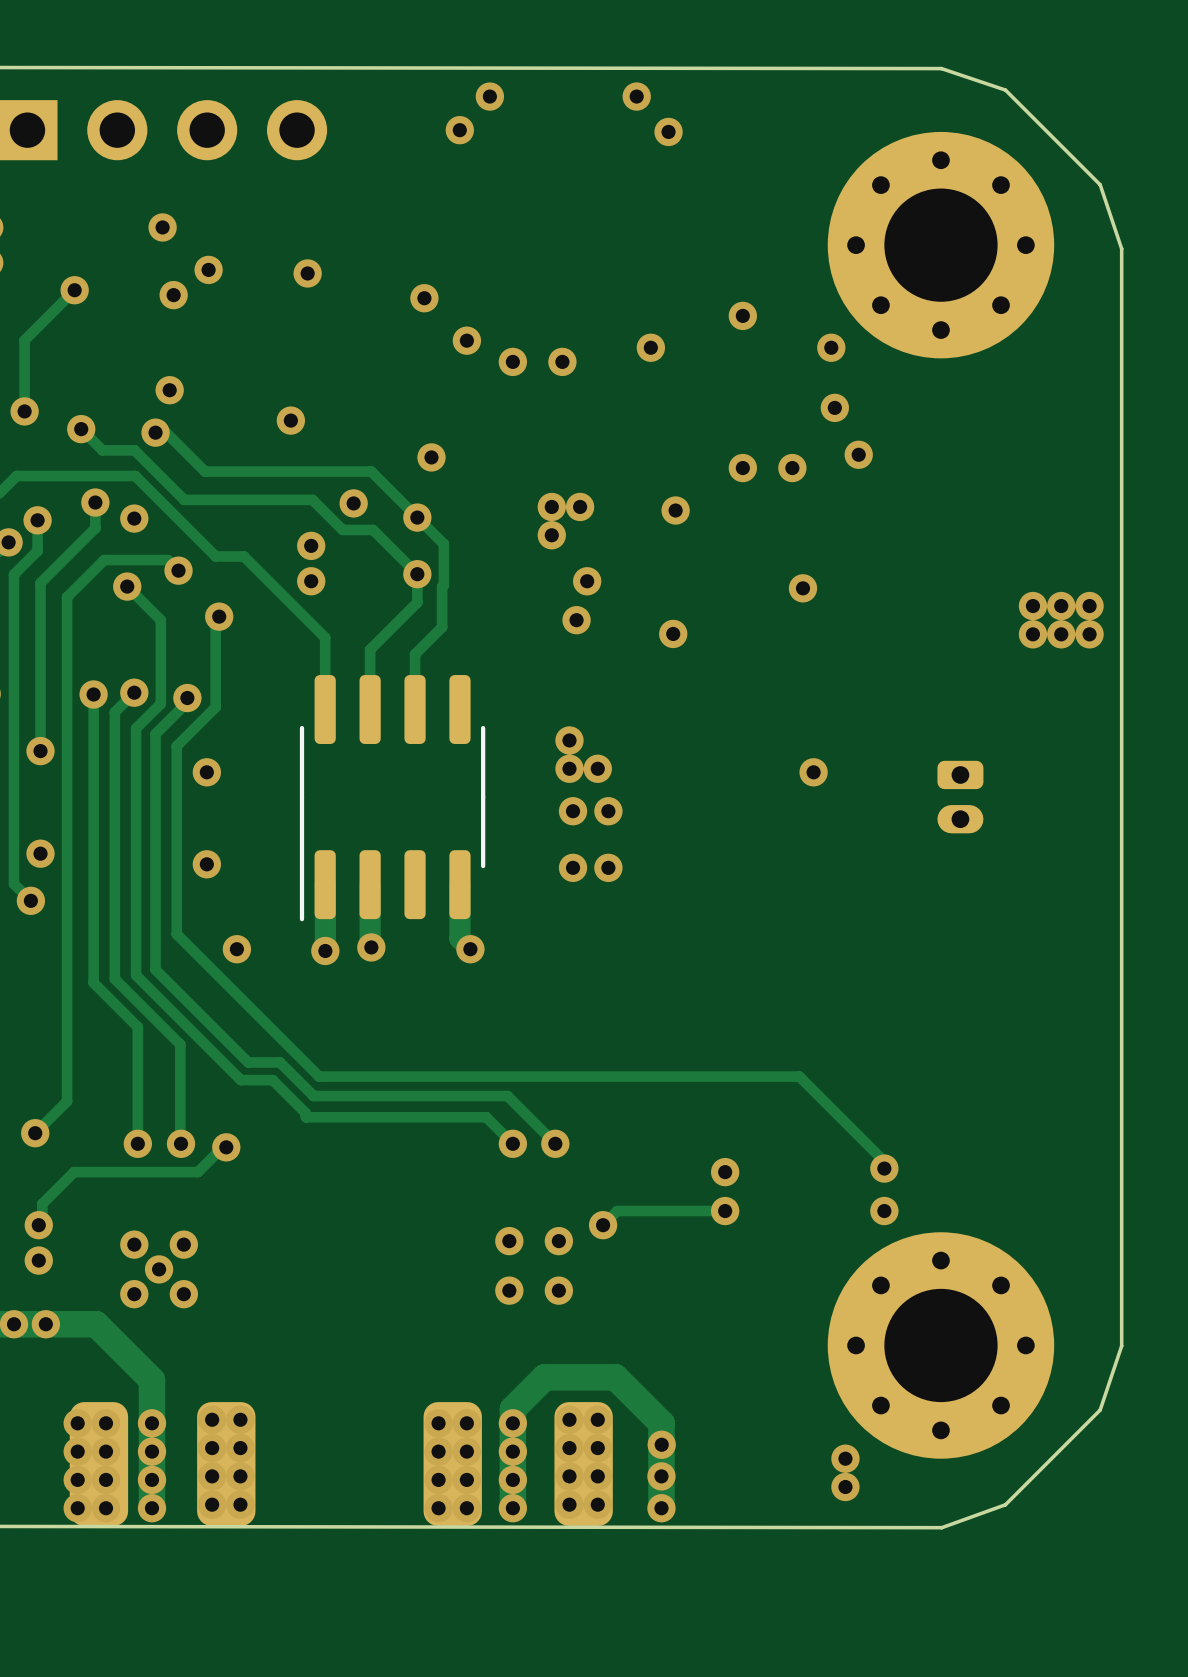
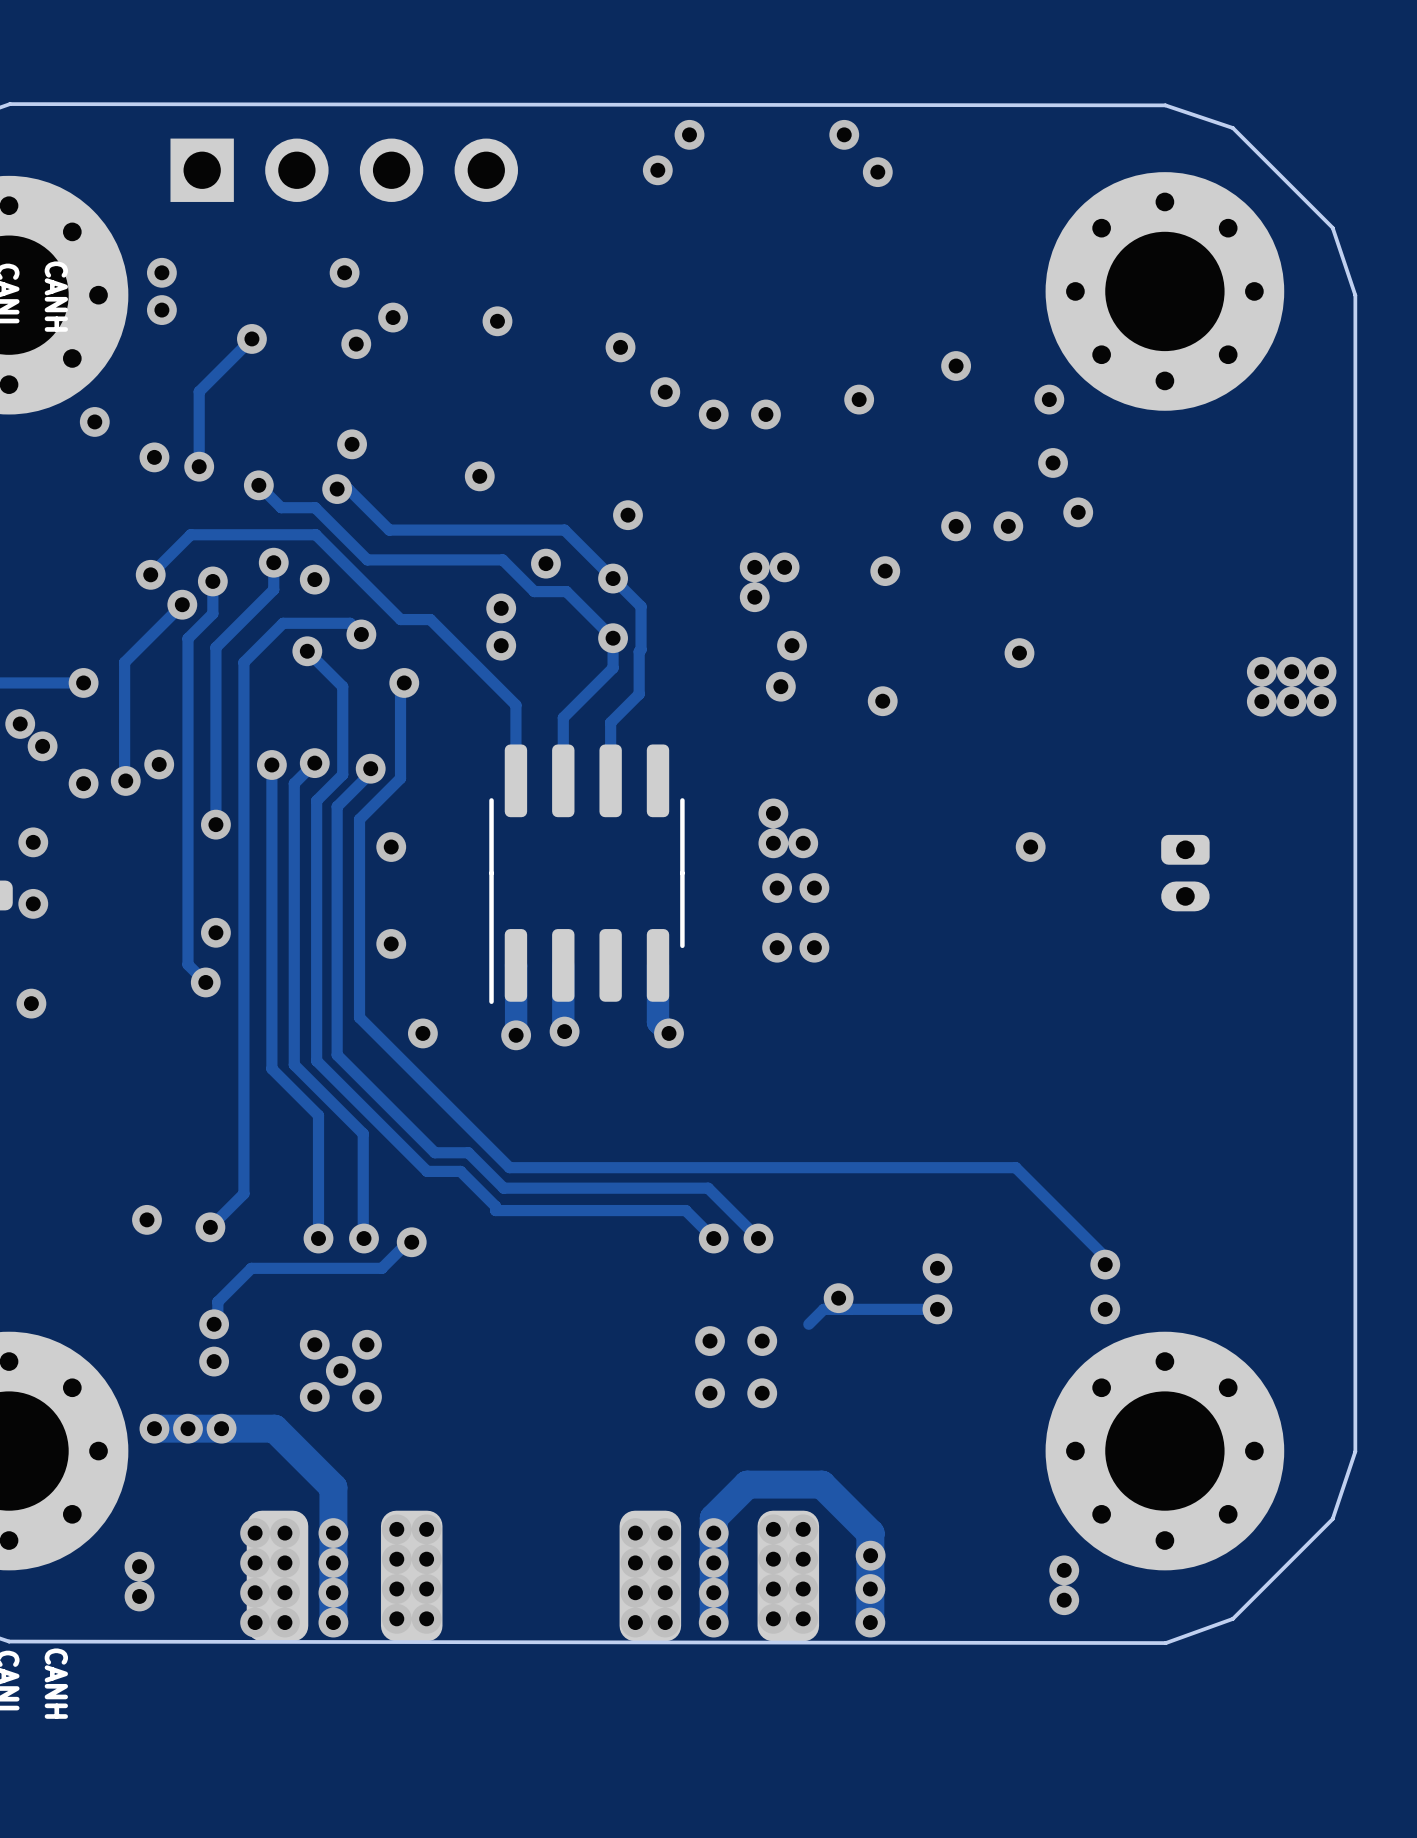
via position: (603, 1225) -> (838, 1298)

